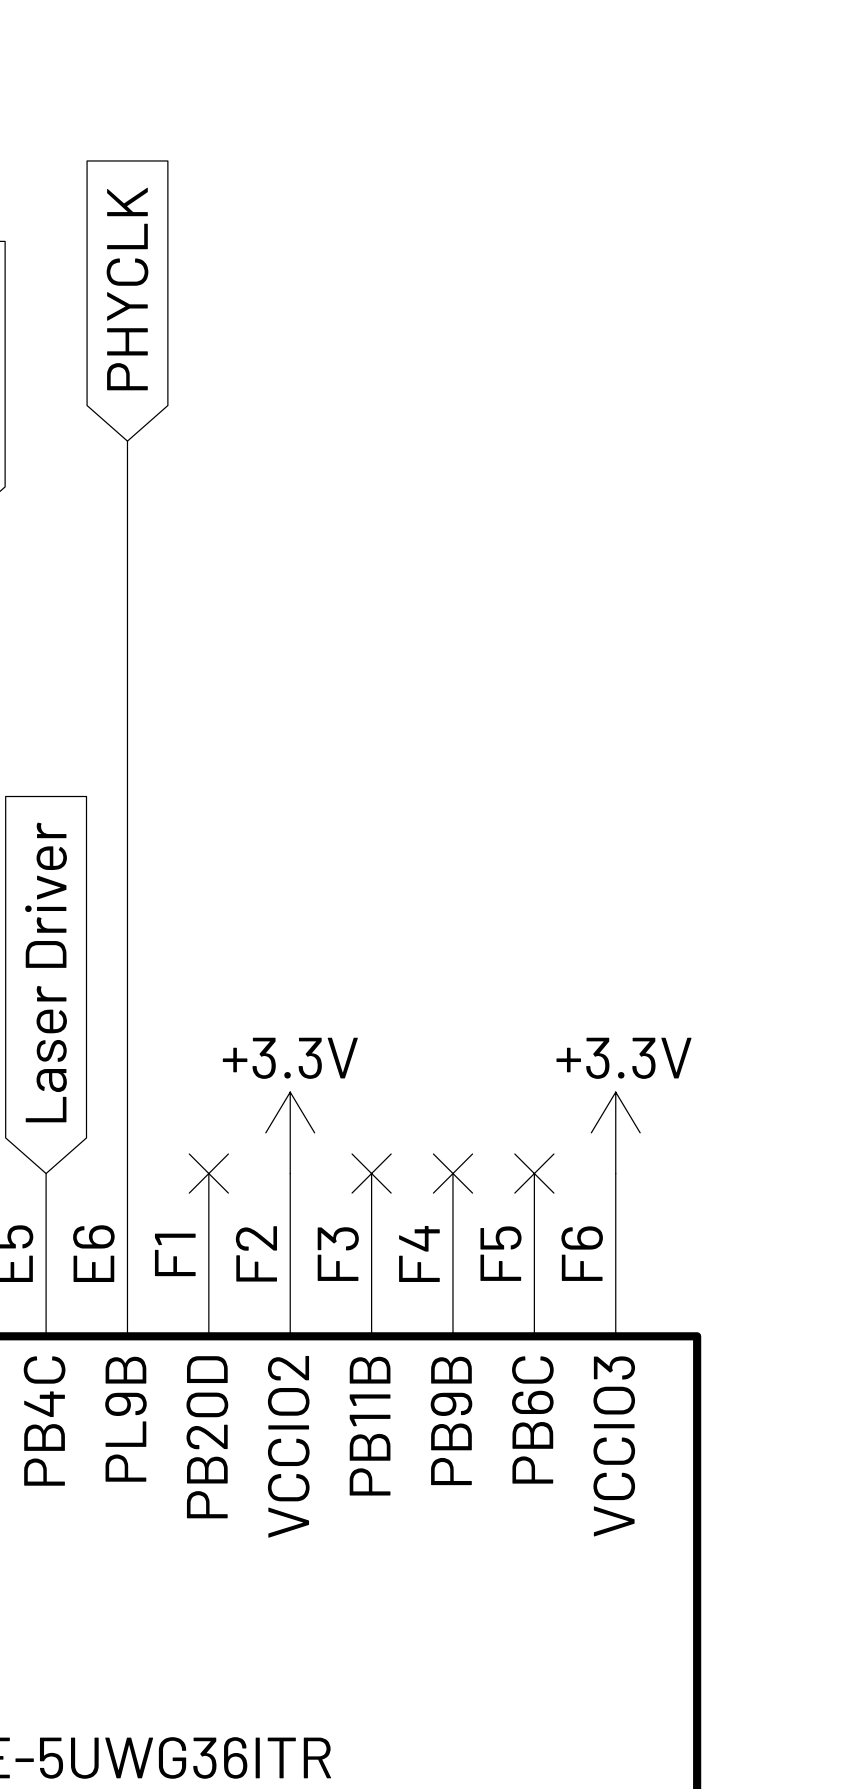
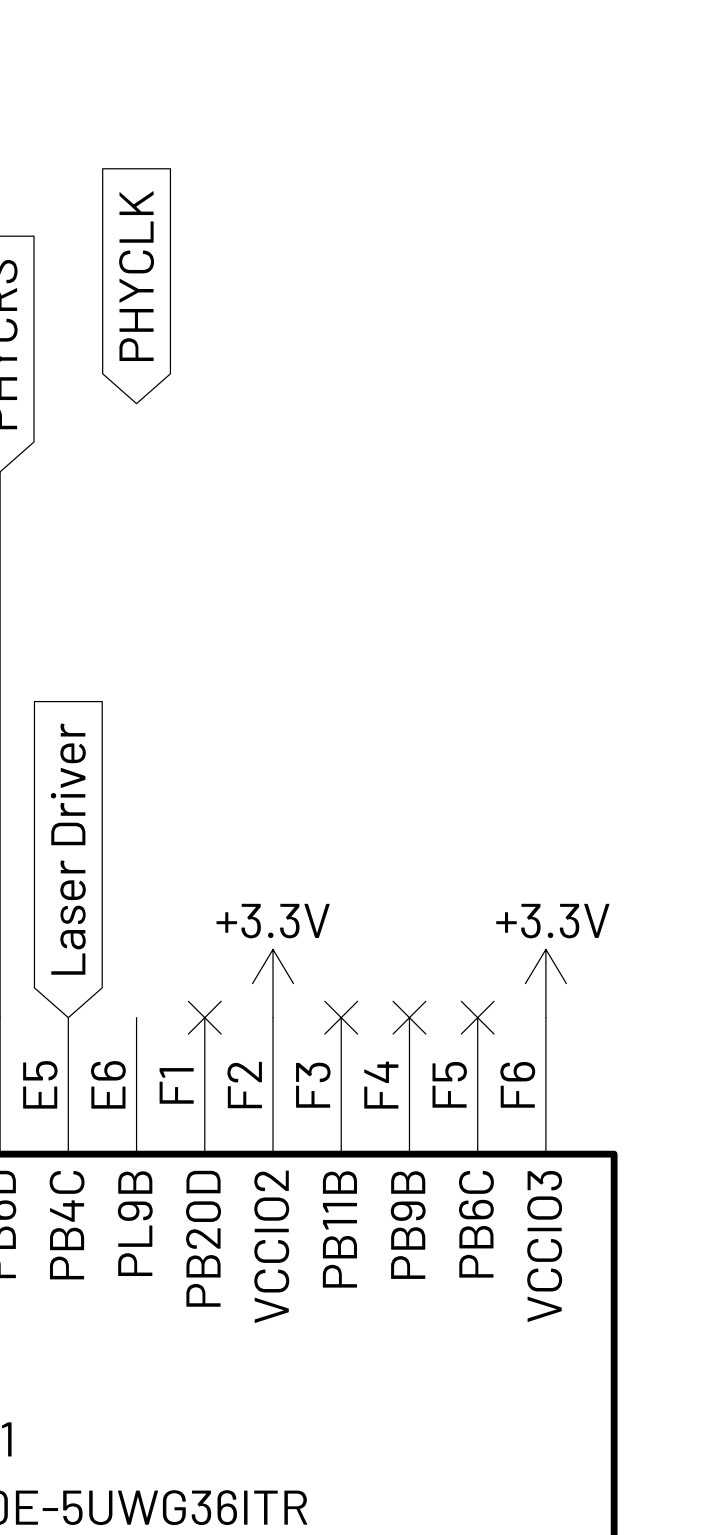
wire: (127, 441) (127, 1173) -> none

